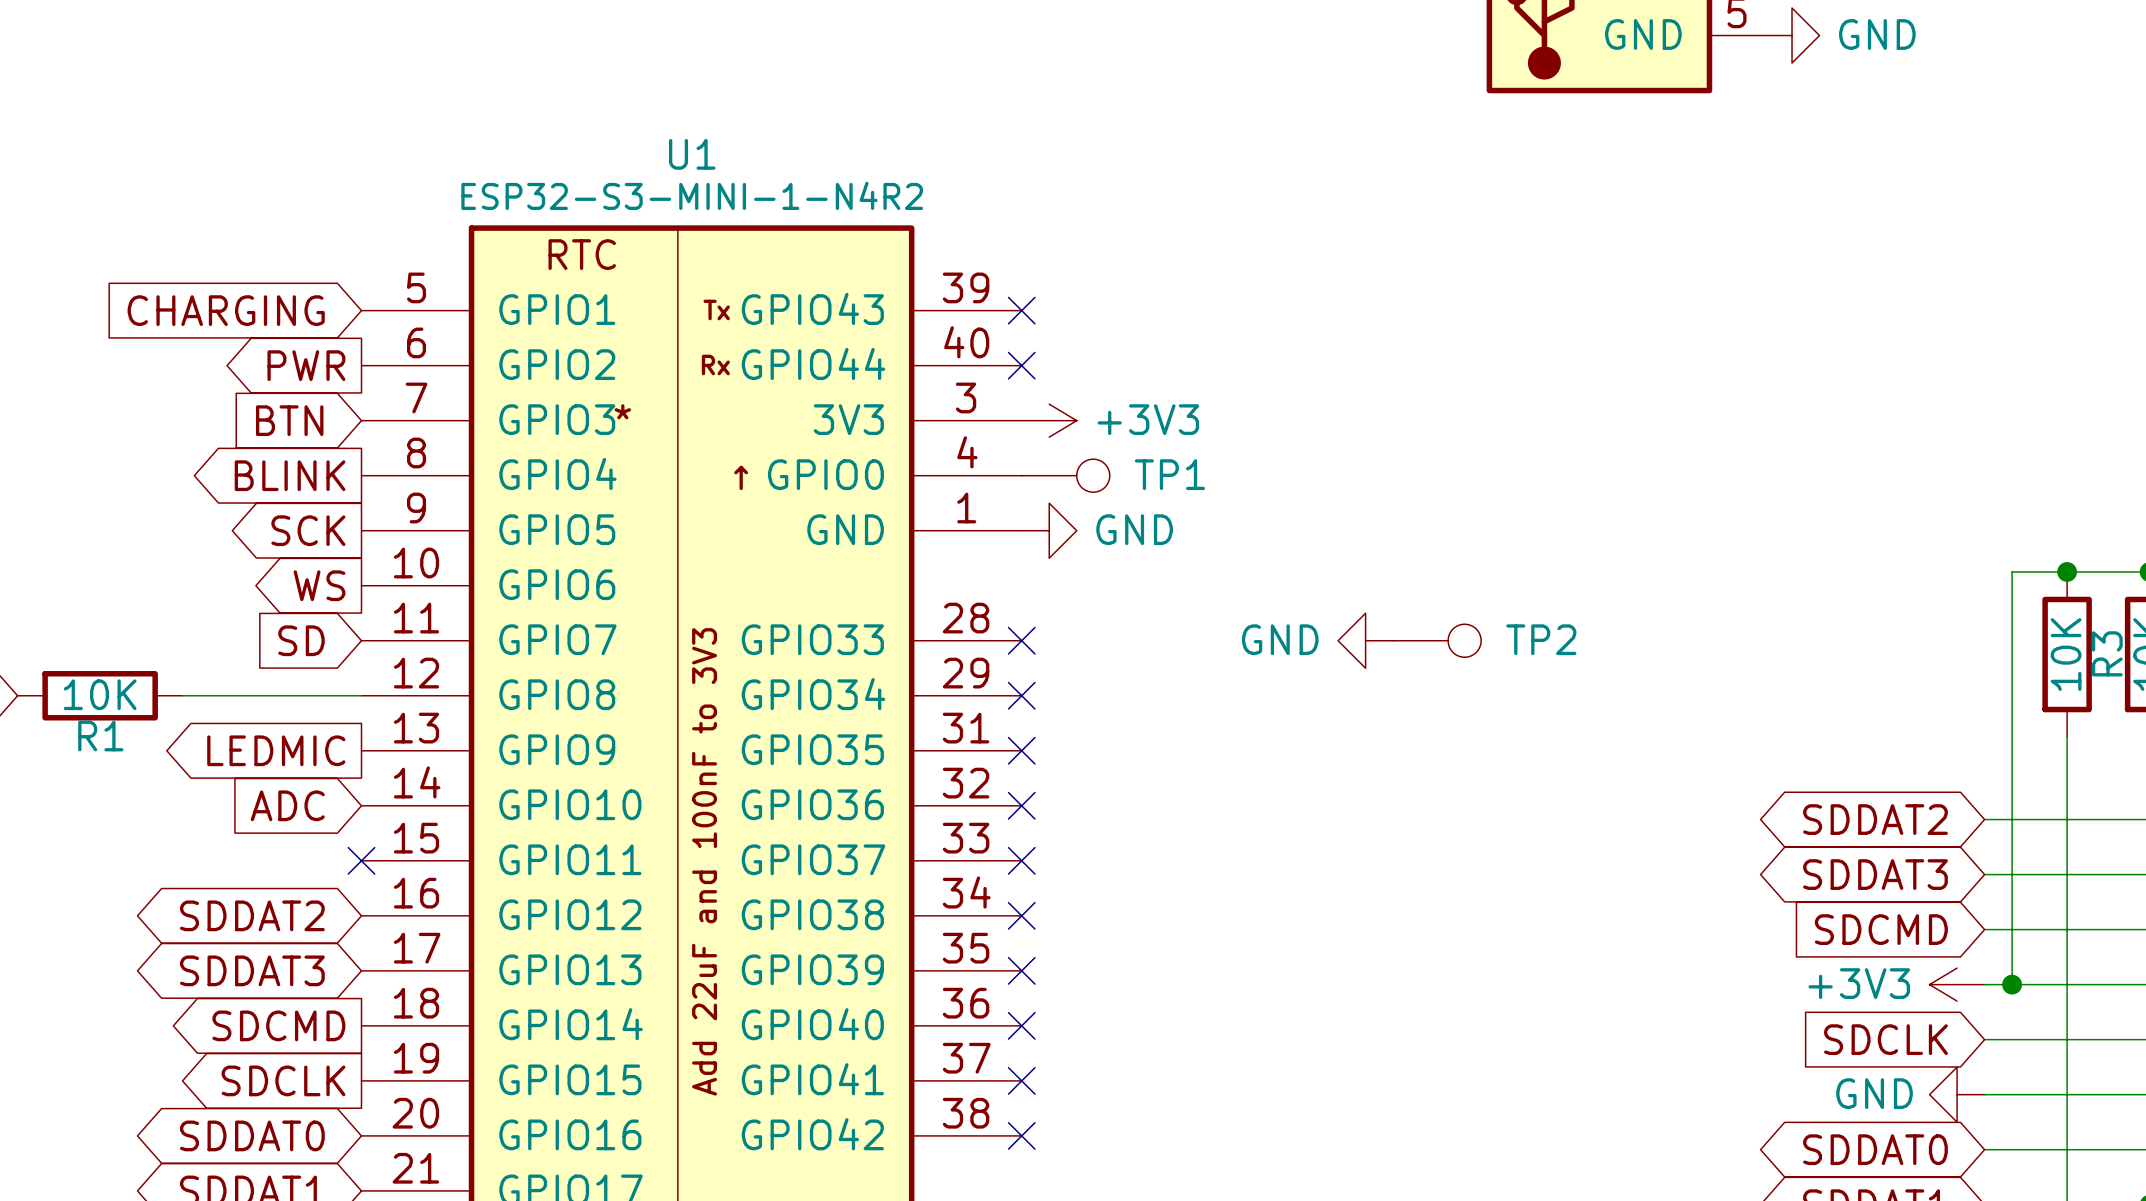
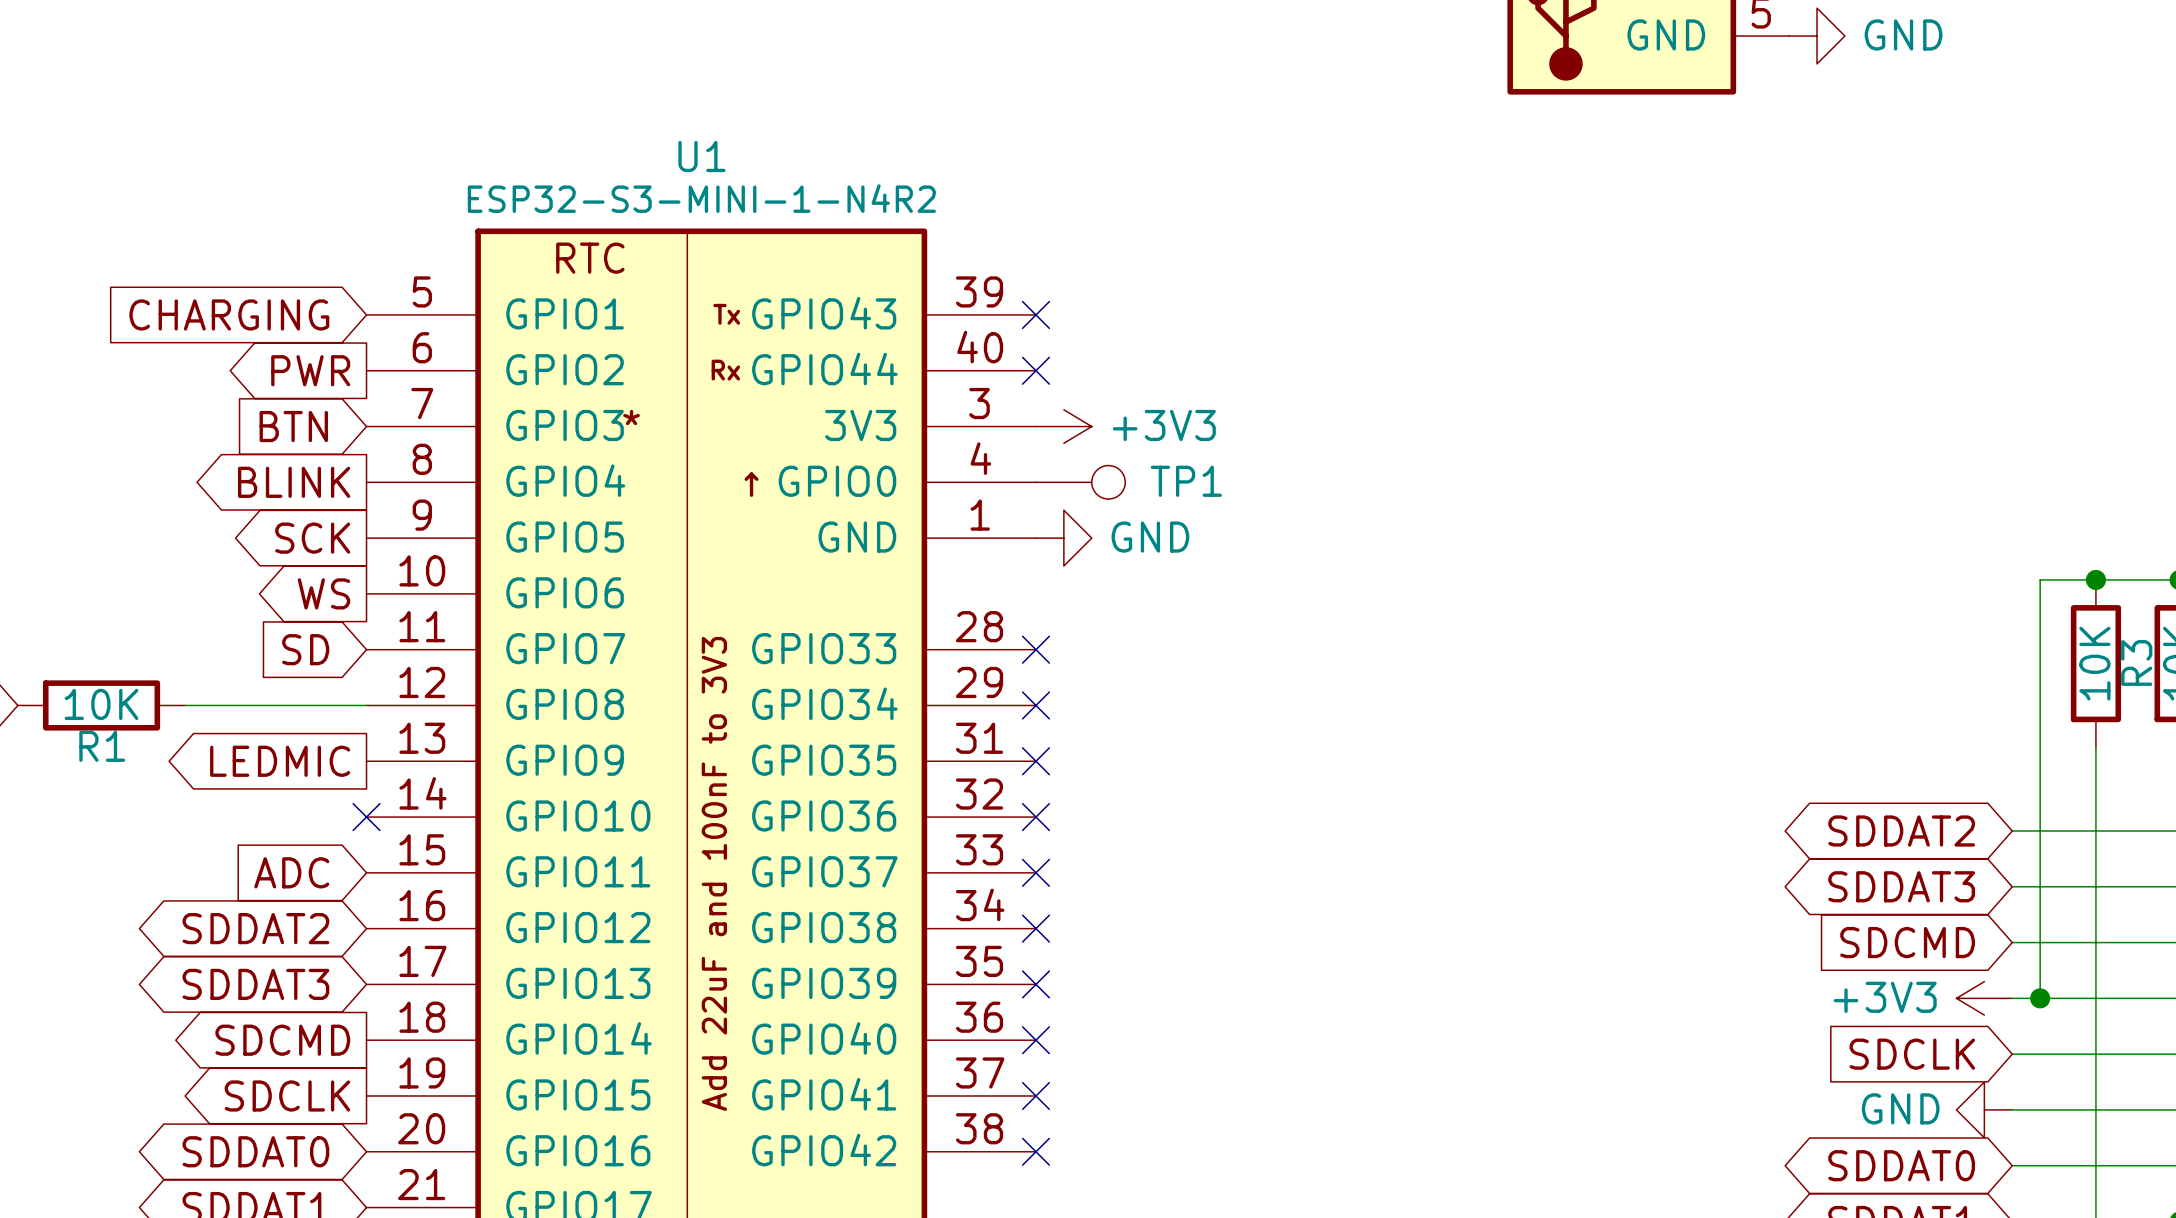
power symbol: GND (1365, 640) -> none
TP2: (1437, 640) -> none
global label position: ADC (287, 805) -> ADC (291, 872)
no-connect mark position: (361, 860) -> (366, 817)

